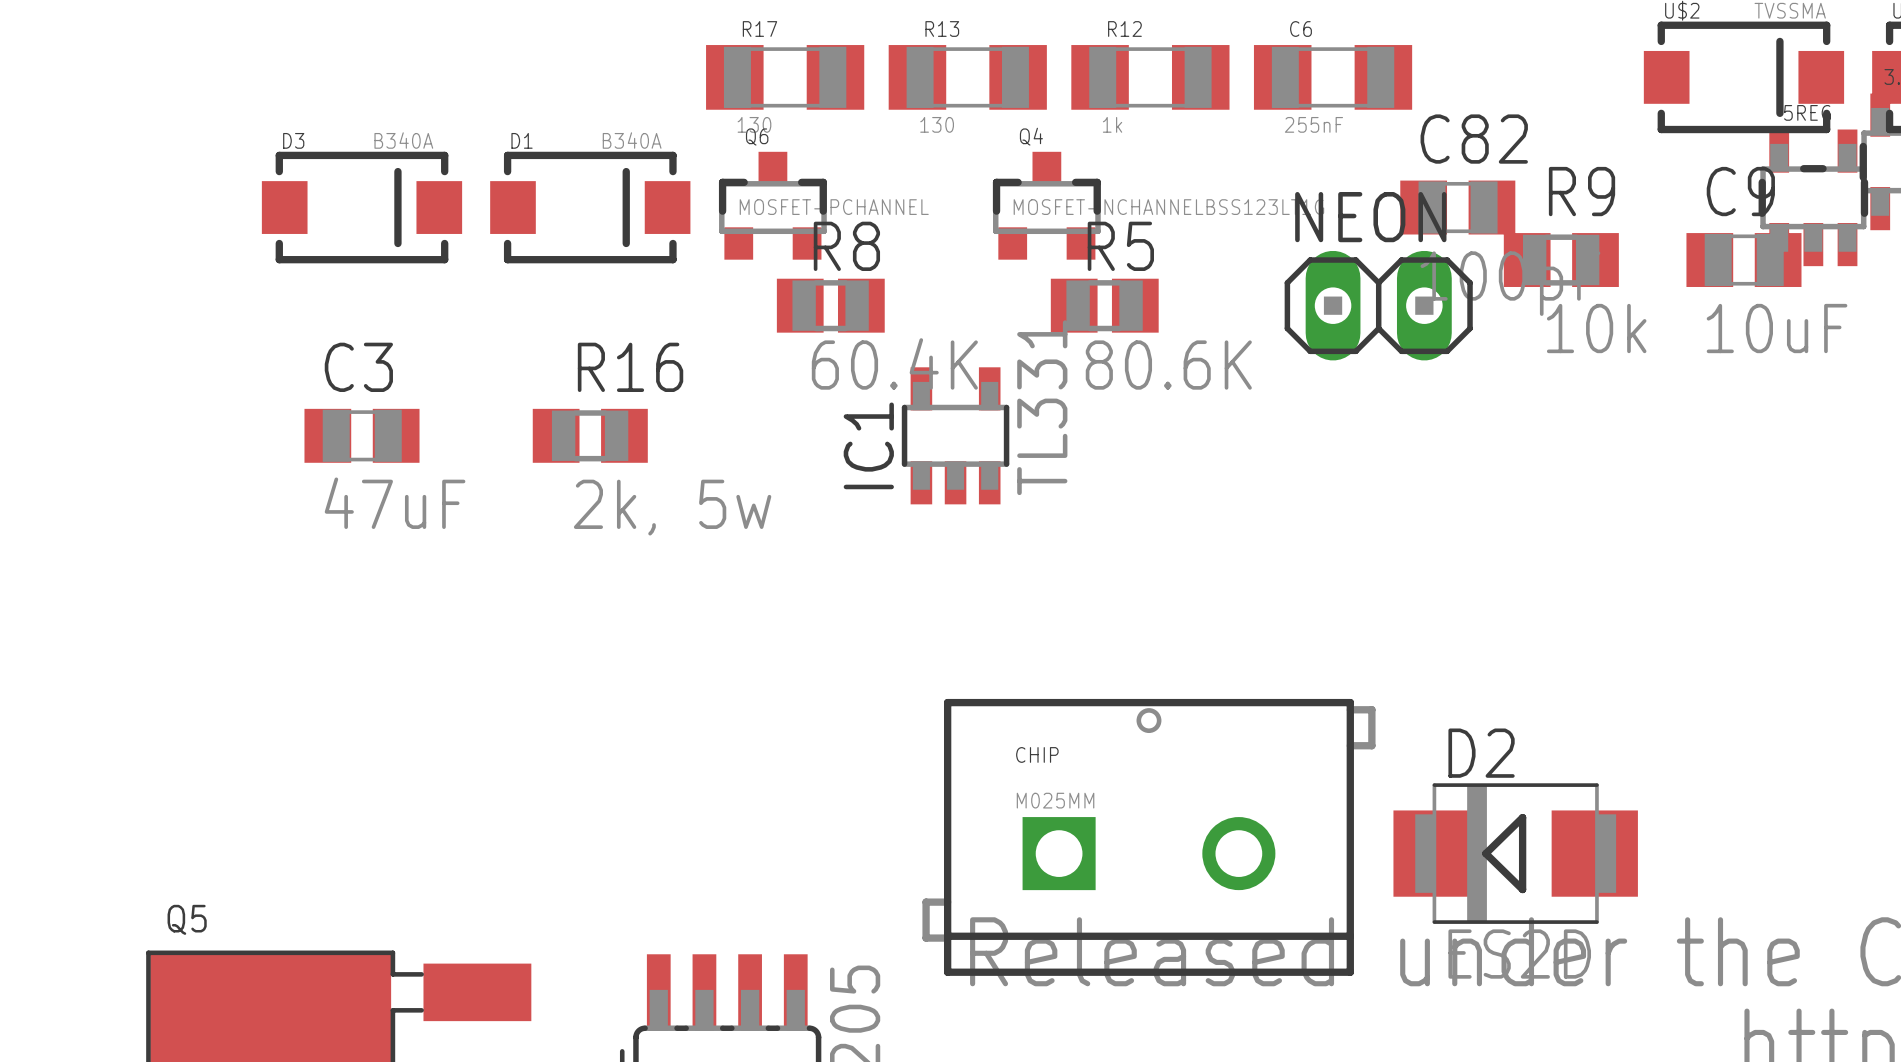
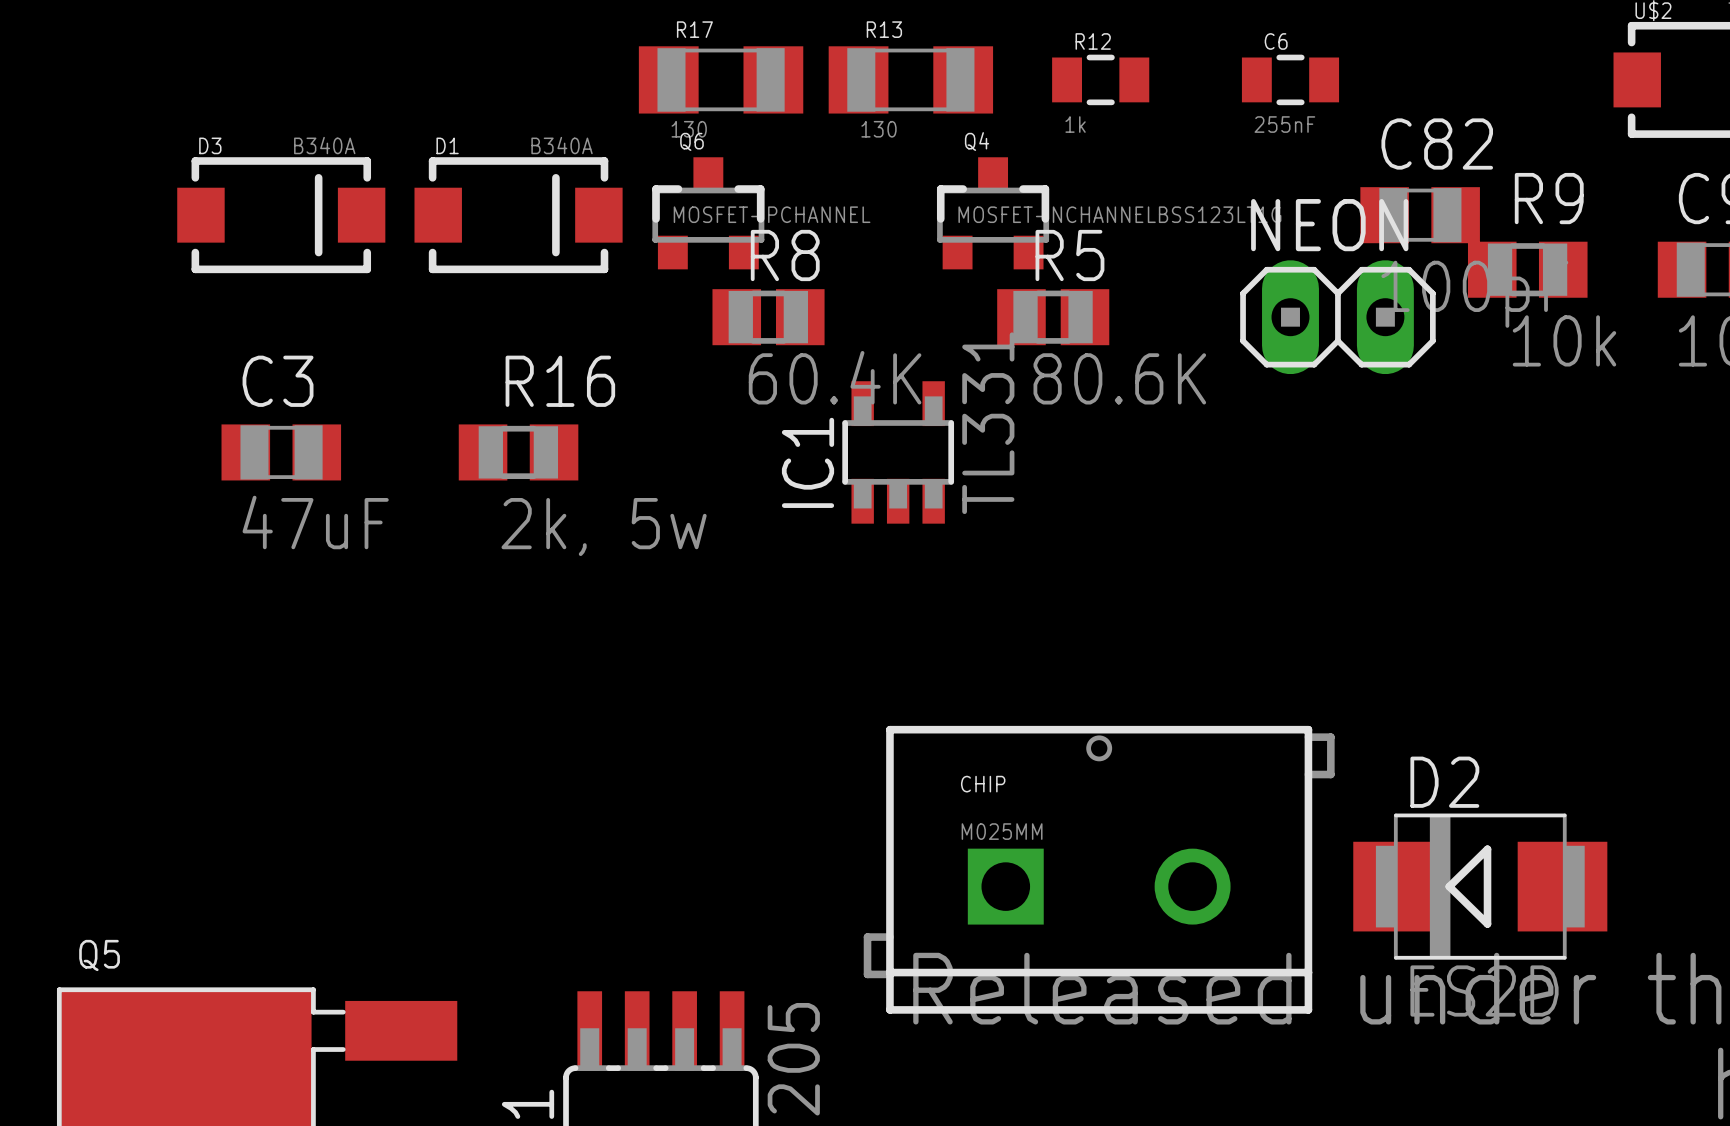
R12 footprint: [1071, 45, 1230, 110] -> [1052, 54, 1150, 106]
C6 footprint: [1253, 45, 1413, 110] -> [1241, 54, 1340, 106]

